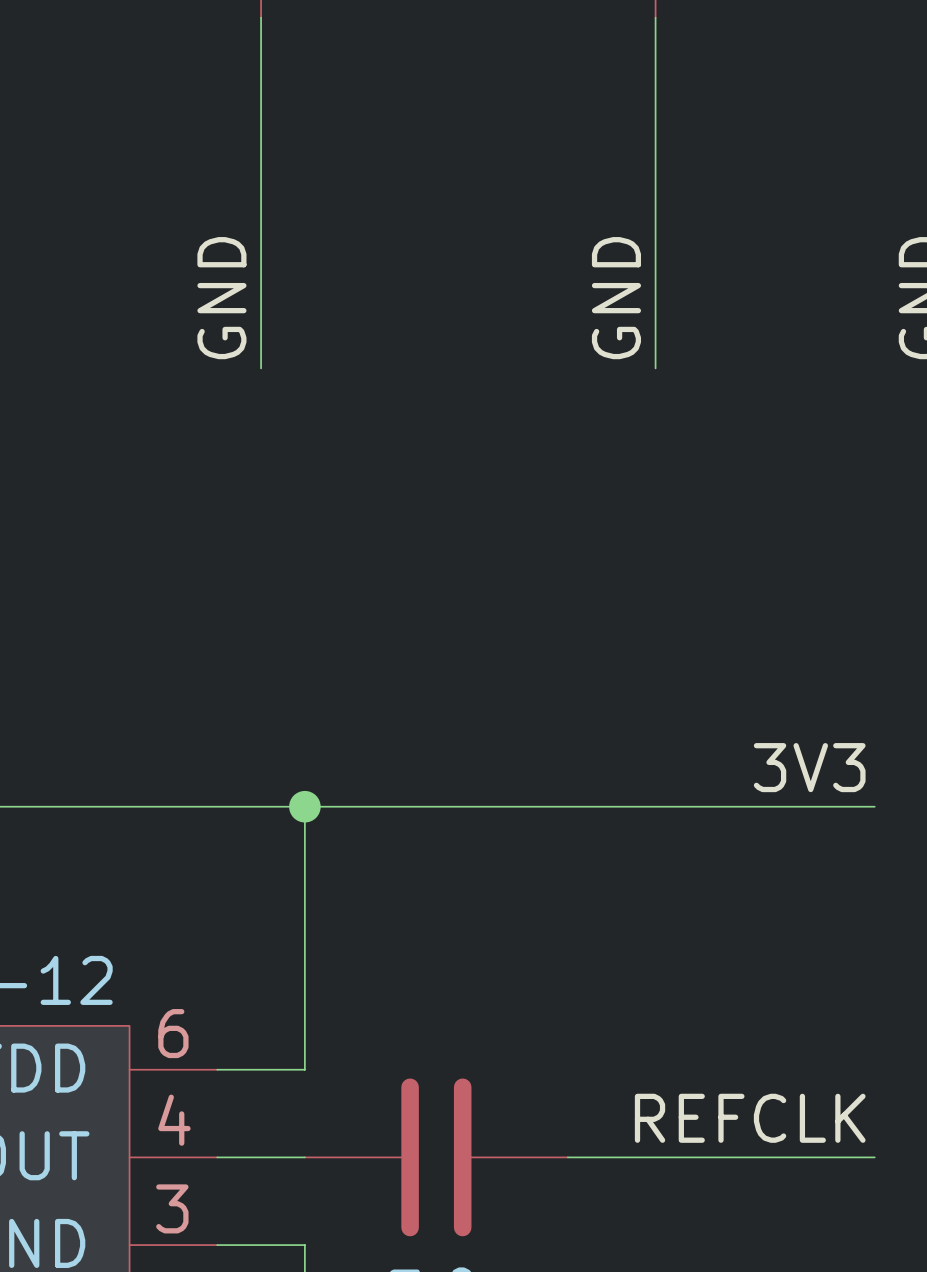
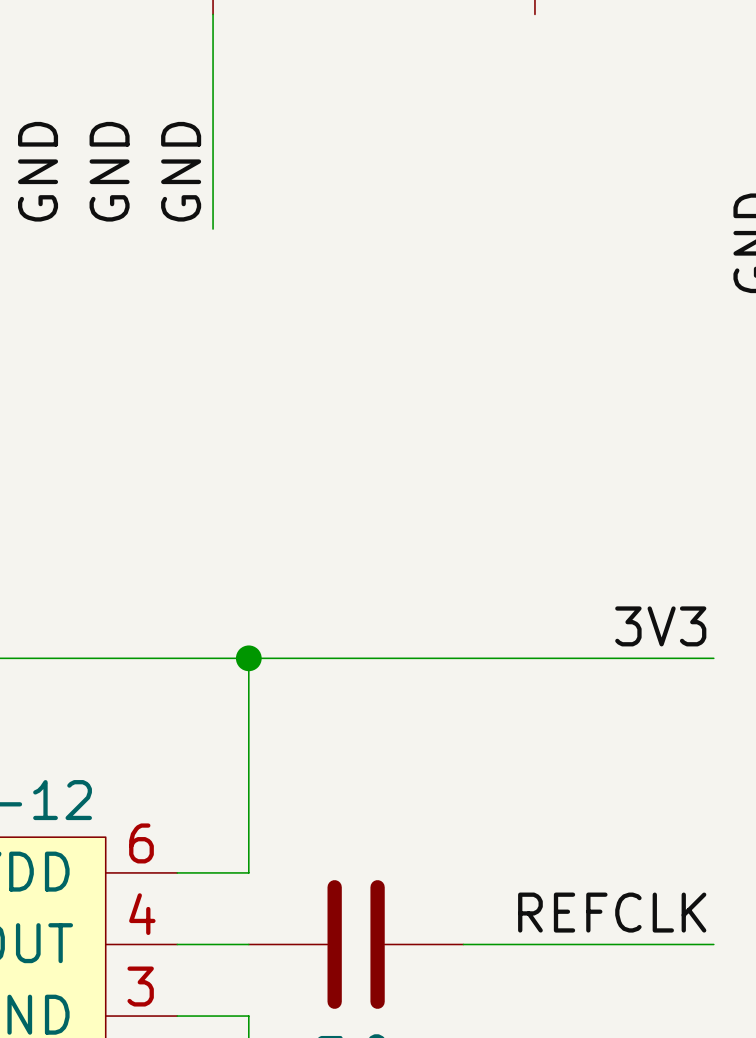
wire: (655, 17) (655, 368) -> none
label: none -> GND (38, 171)
label: none -> GND (109, 171)
label: none -> GND (181, 171)
wire: (261, 280) (261, 368) -> none
label: GND (221, 298) -> none
label: GND (616, 298) -> none

